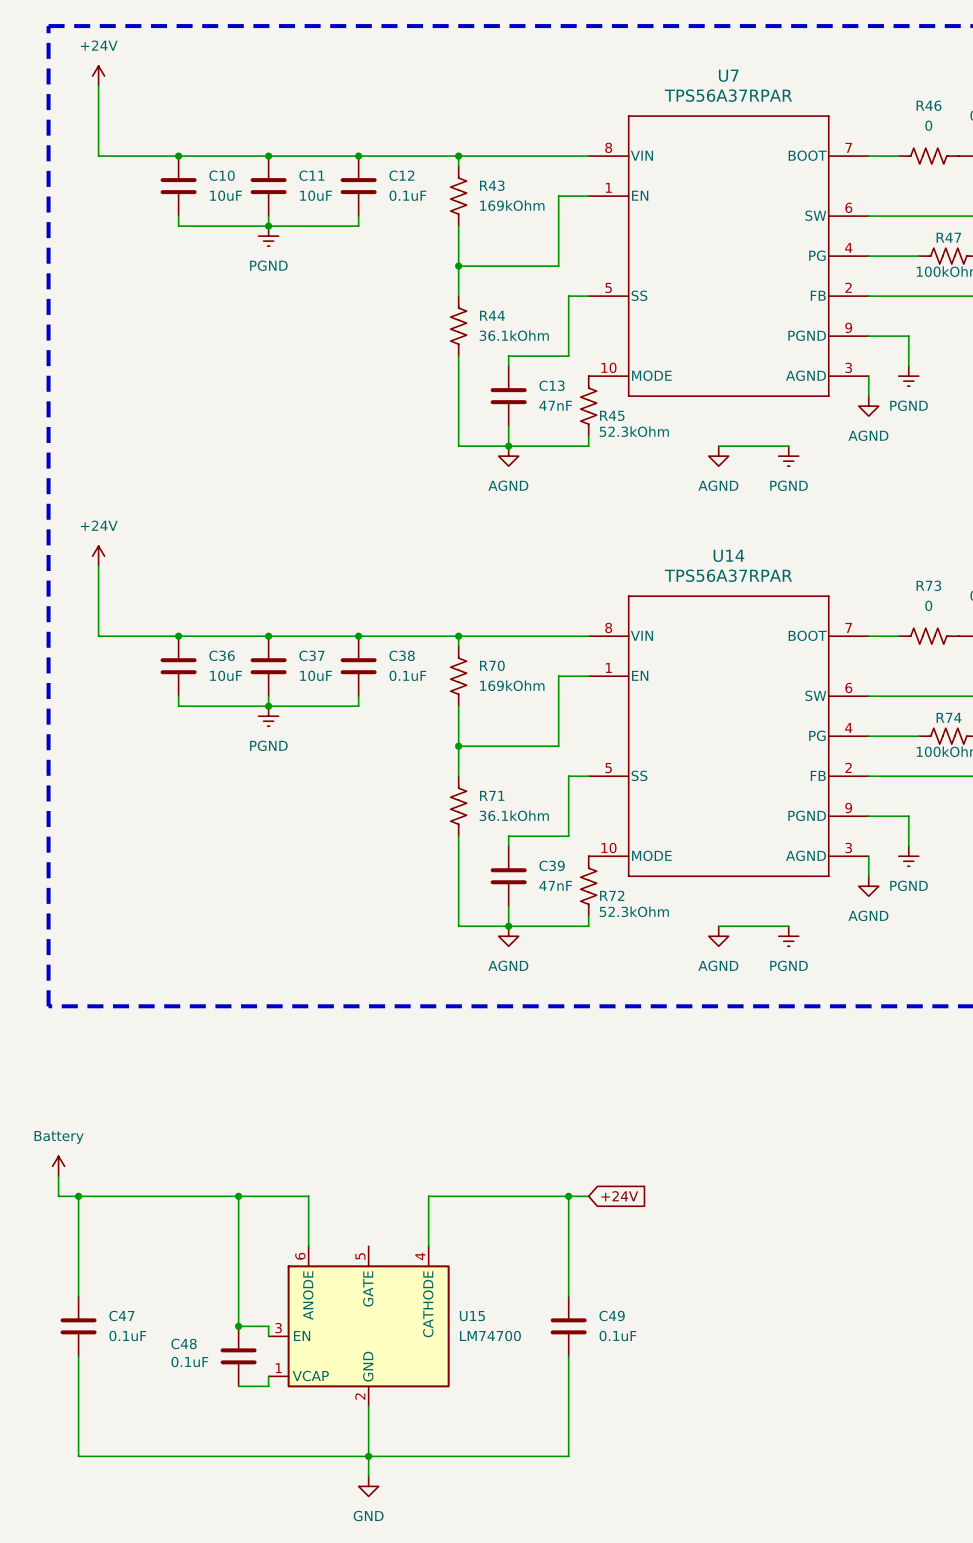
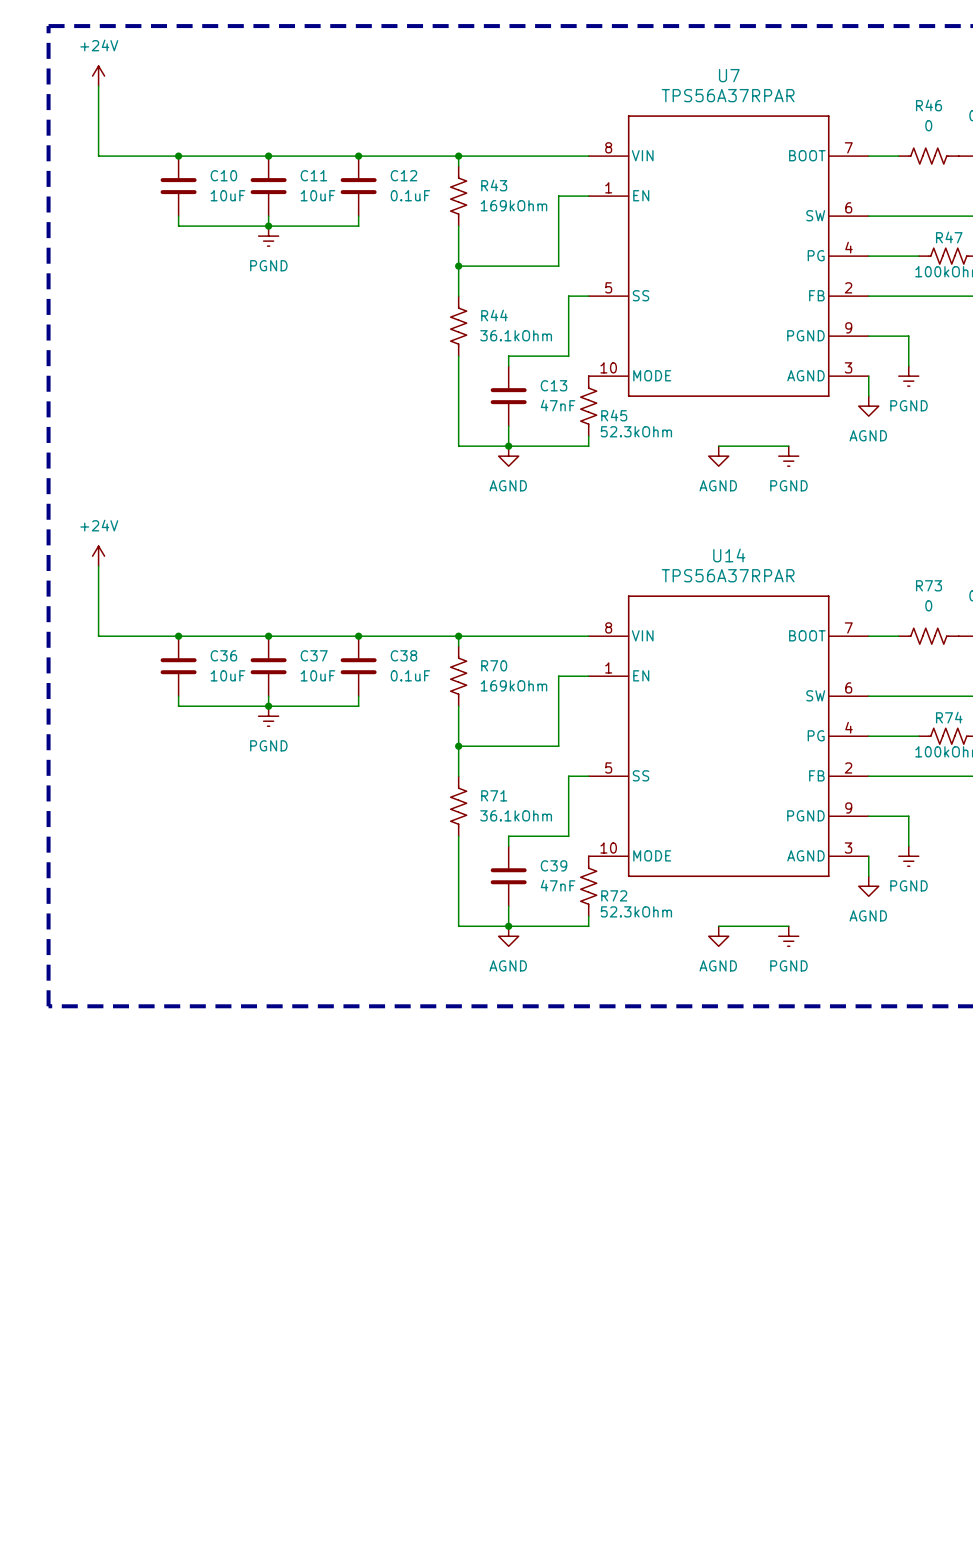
power symbol: Battery (58, 1166) -> none
wire: (58, 1176) (58, 1196) (308, 1196) (308, 1246) -> none
wire: (78, 1196) (78, 1296) -> none
junction: (78, 1196) -> none
wire: (238, 1196) (238, 1326) (268, 1326) (268, 1336) -> none
junction: (238, 1196) -> none
wire: (568, 1196) (568, 1296) -> none
junction: (568, 1196) -> none
wire: (588, 1196) (428, 1196) (428, 1246) -> none
global label: +24V (619, 1196) -> none
C47: 0.1uF (78, 1326) -> none
junction: (238, 1326) -> none
U15: LM74700 (359, 1326) -> none
C49: 0.1uF (568, 1326) -> none
wire: (78, 1356) (78, 1456) (568, 1456) (568, 1356) -> none
C48: 0.1uF (238, 1356) -> none
wire: (268, 1376) (268, 1386) (238, 1386) -> none
wire: (368, 1406) (368, 1476) -> none
junction: (368, 1456) -> none
power symbol: GND (368, 1486) -> none

